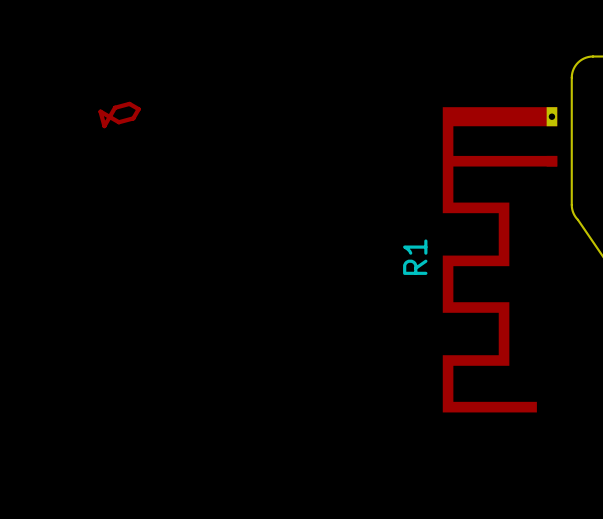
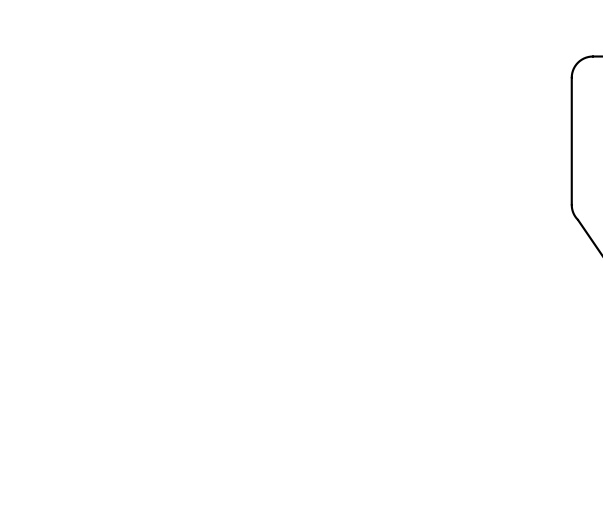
track: (129, 103) (138, 109) (133, 118) (118, 122) (100, 111) (104, 126) (115, 107) (129, 103) -> none
R1: (500, 259) -> none

